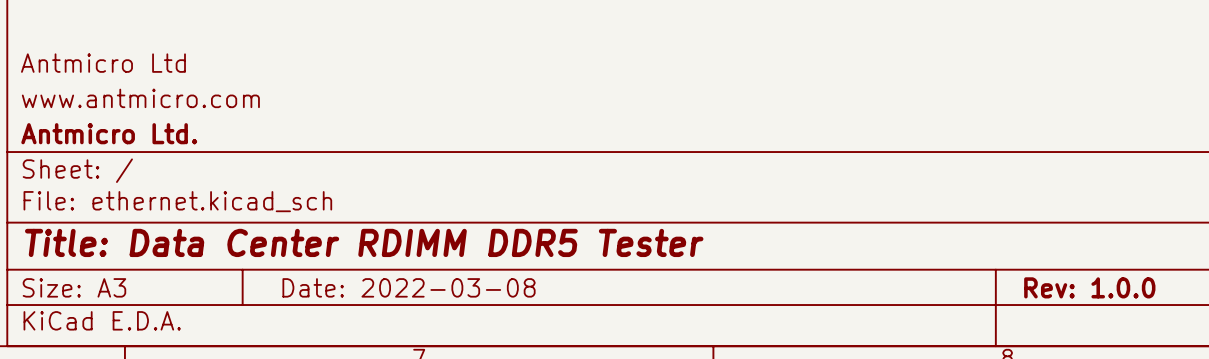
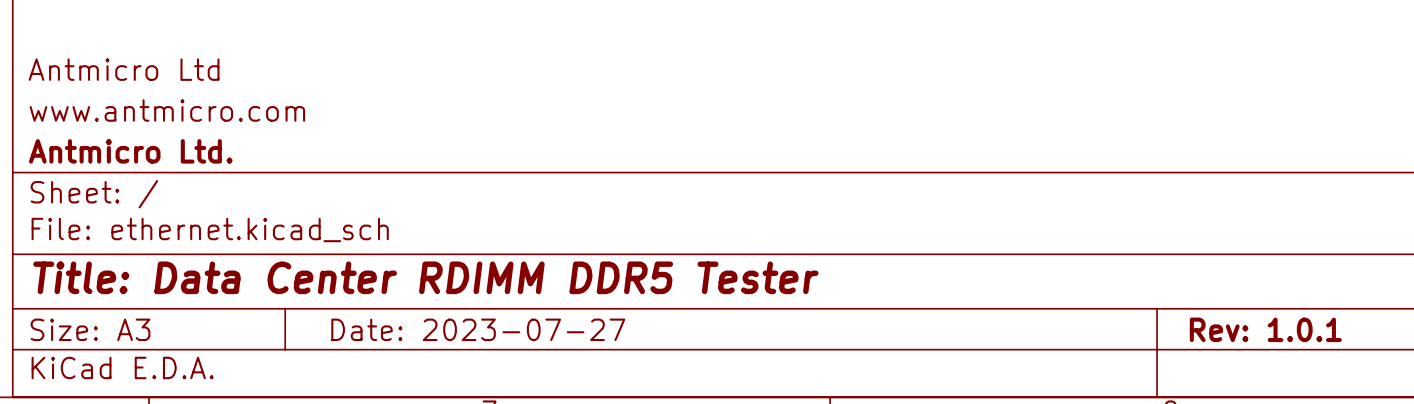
title block: Date: 2022-03-08 (409, 287) -> Date: 2023-07-27 (478, 329)
title block: Rev: 1.0.0 (1089, 287) -> Rev: 1.0.1 (1265, 329)

